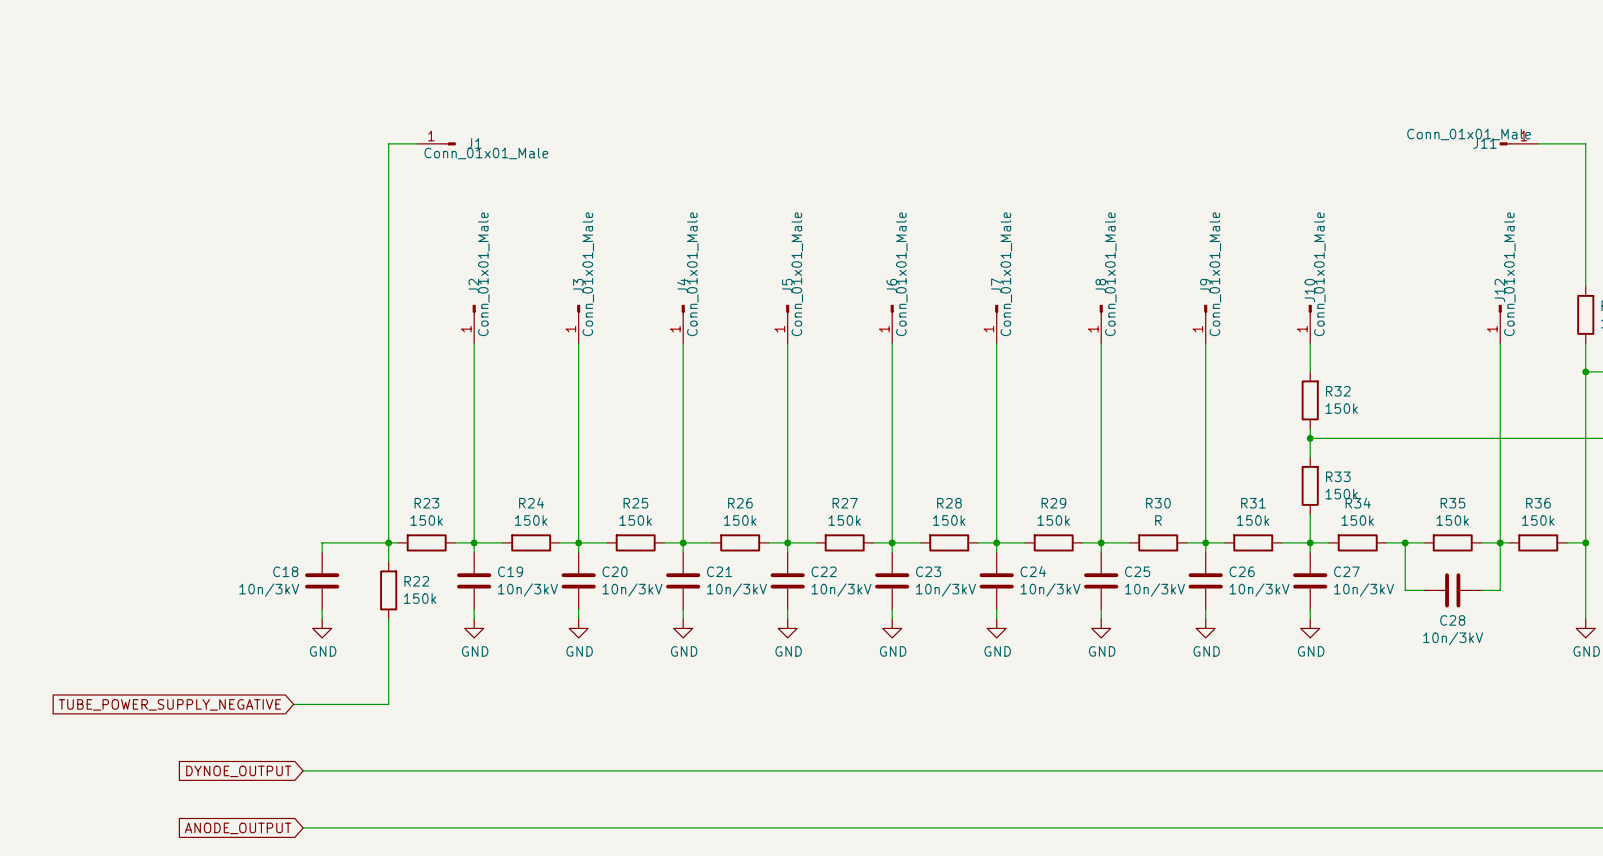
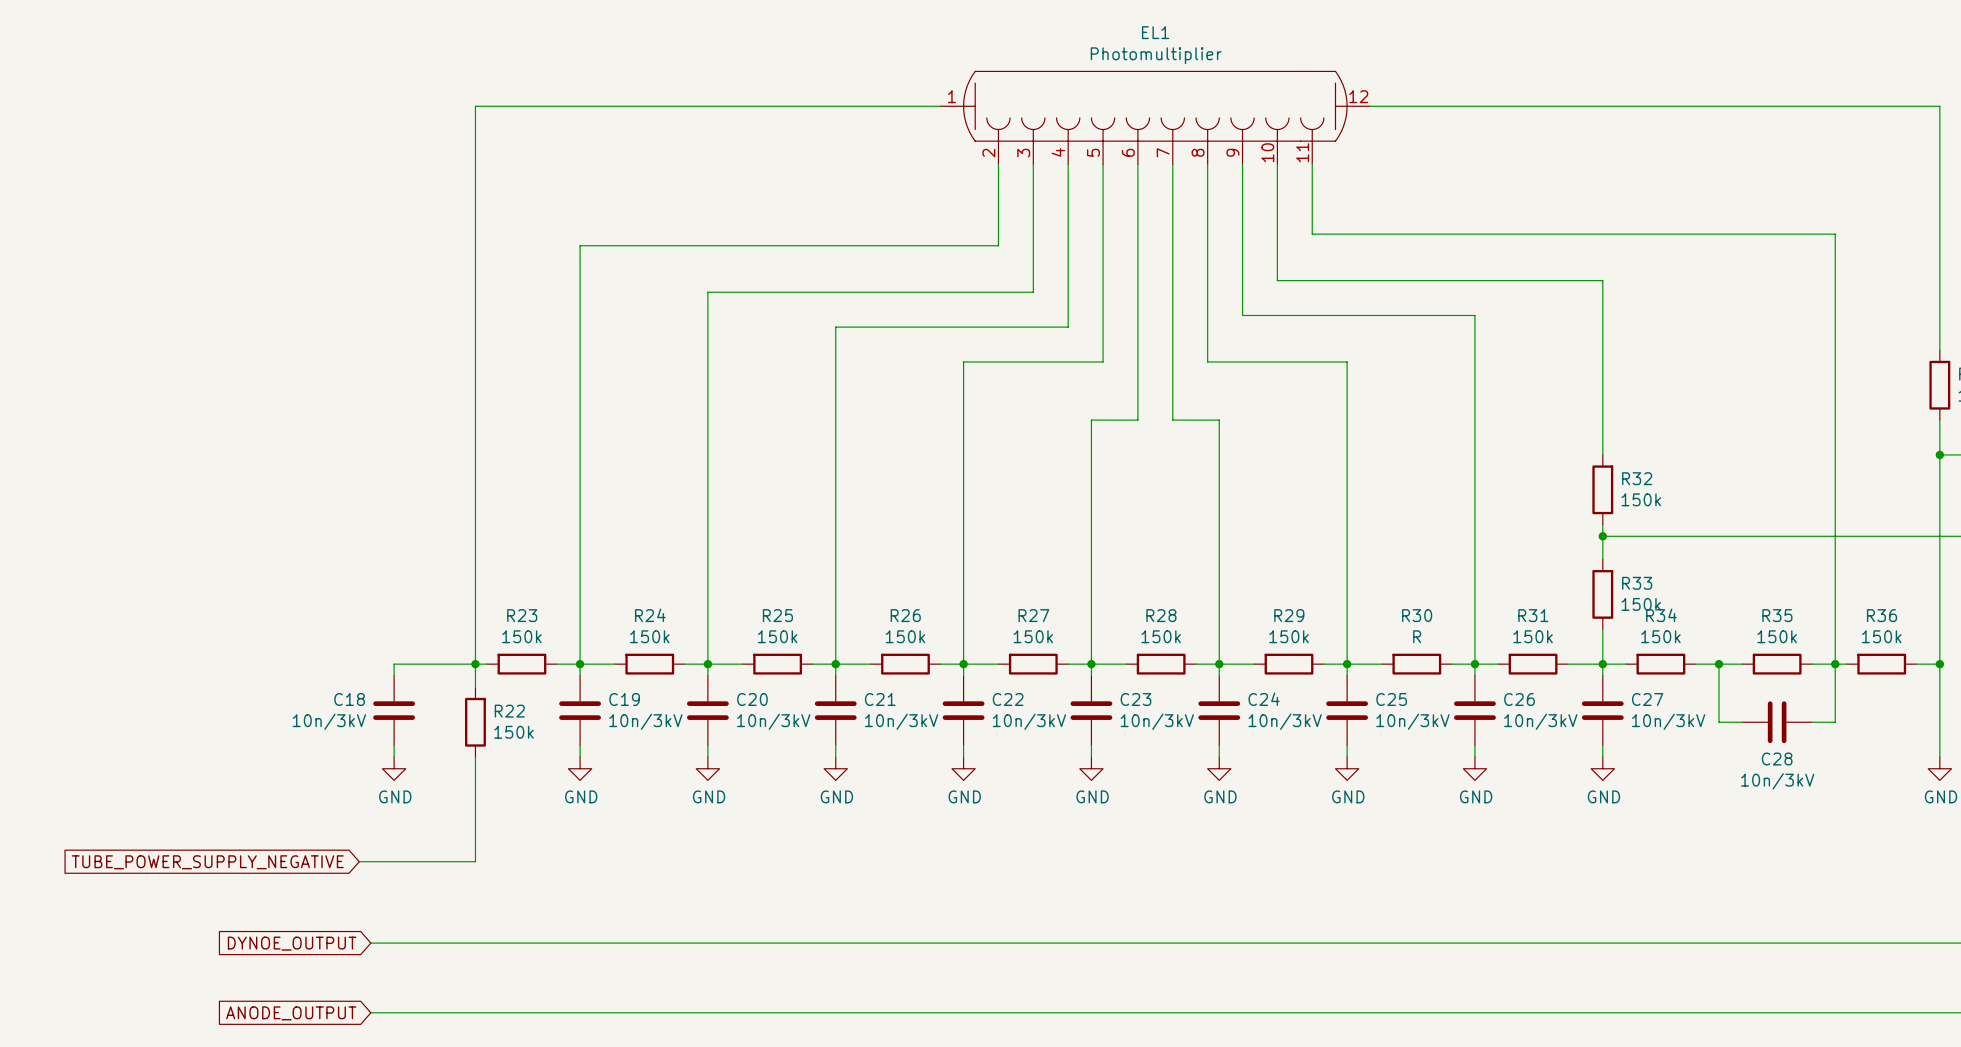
EL1: none -> Photomultiplier (1155, 117)
wire: none -> (998, 164) (998, 245) (580, 245) (580, 420)
wire: none -> (1033, 164) (1033, 292) (707, 292) (707, 420)
wire: none -> (1068, 164) (1068, 327) (835, 327) (835, 420)
wire: none -> (1103, 164) (1103, 361) (963, 361) (963, 420)
wire: none -> (1137, 164) (1137, 420) (1091, 420)
wire: none -> (1172, 164) (1172, 420) (1219, 420)
wire: none -> (1207, 164) (1207, 361) (1347, 361) (1347, 420)
wire: none -> (1242, 164) (1242, 315) (1474, 315) (1474, 420)
wire: none -> (1277, 164) (1277, 280) (1602, 280) (1602, 420)
wire: none -> (1312, 164) (1312, 234) (1835, 234) (1835, 420)
wire: (388, 143) (417, 143) -> (475, 176) (475, 106) (940, 106)
J1: Conn_01x01_Male (436, 143) -> none
J11: Conn_01x01_Male (1518, 143) -> none
wire: (1538, 143) (1585, 143) -> (1370, 106) (1939, 106) (1939, 176)
J2: Conn_01x01_Male (474, 324) -> none
J3: Conn_01x01_Male (578, 324) -> none
J4: Conn_01x01_Male (683, 324) -> none
J5: Conn_01x01_Male (787, 324) -> none
J6: Conn_01x01_Male (892, 324) -> none
J7: Conn_01x01_Male (996, 324) -> none
J8: Conn_01x01_Male (1101, 324) -> none
J9: Conn_01x01_Male (1205, 324) -> none
J10: Conn_01x01_Male (1310, 324) -> none
J12: Conn_01x01_Male (1500, 324) -> none

